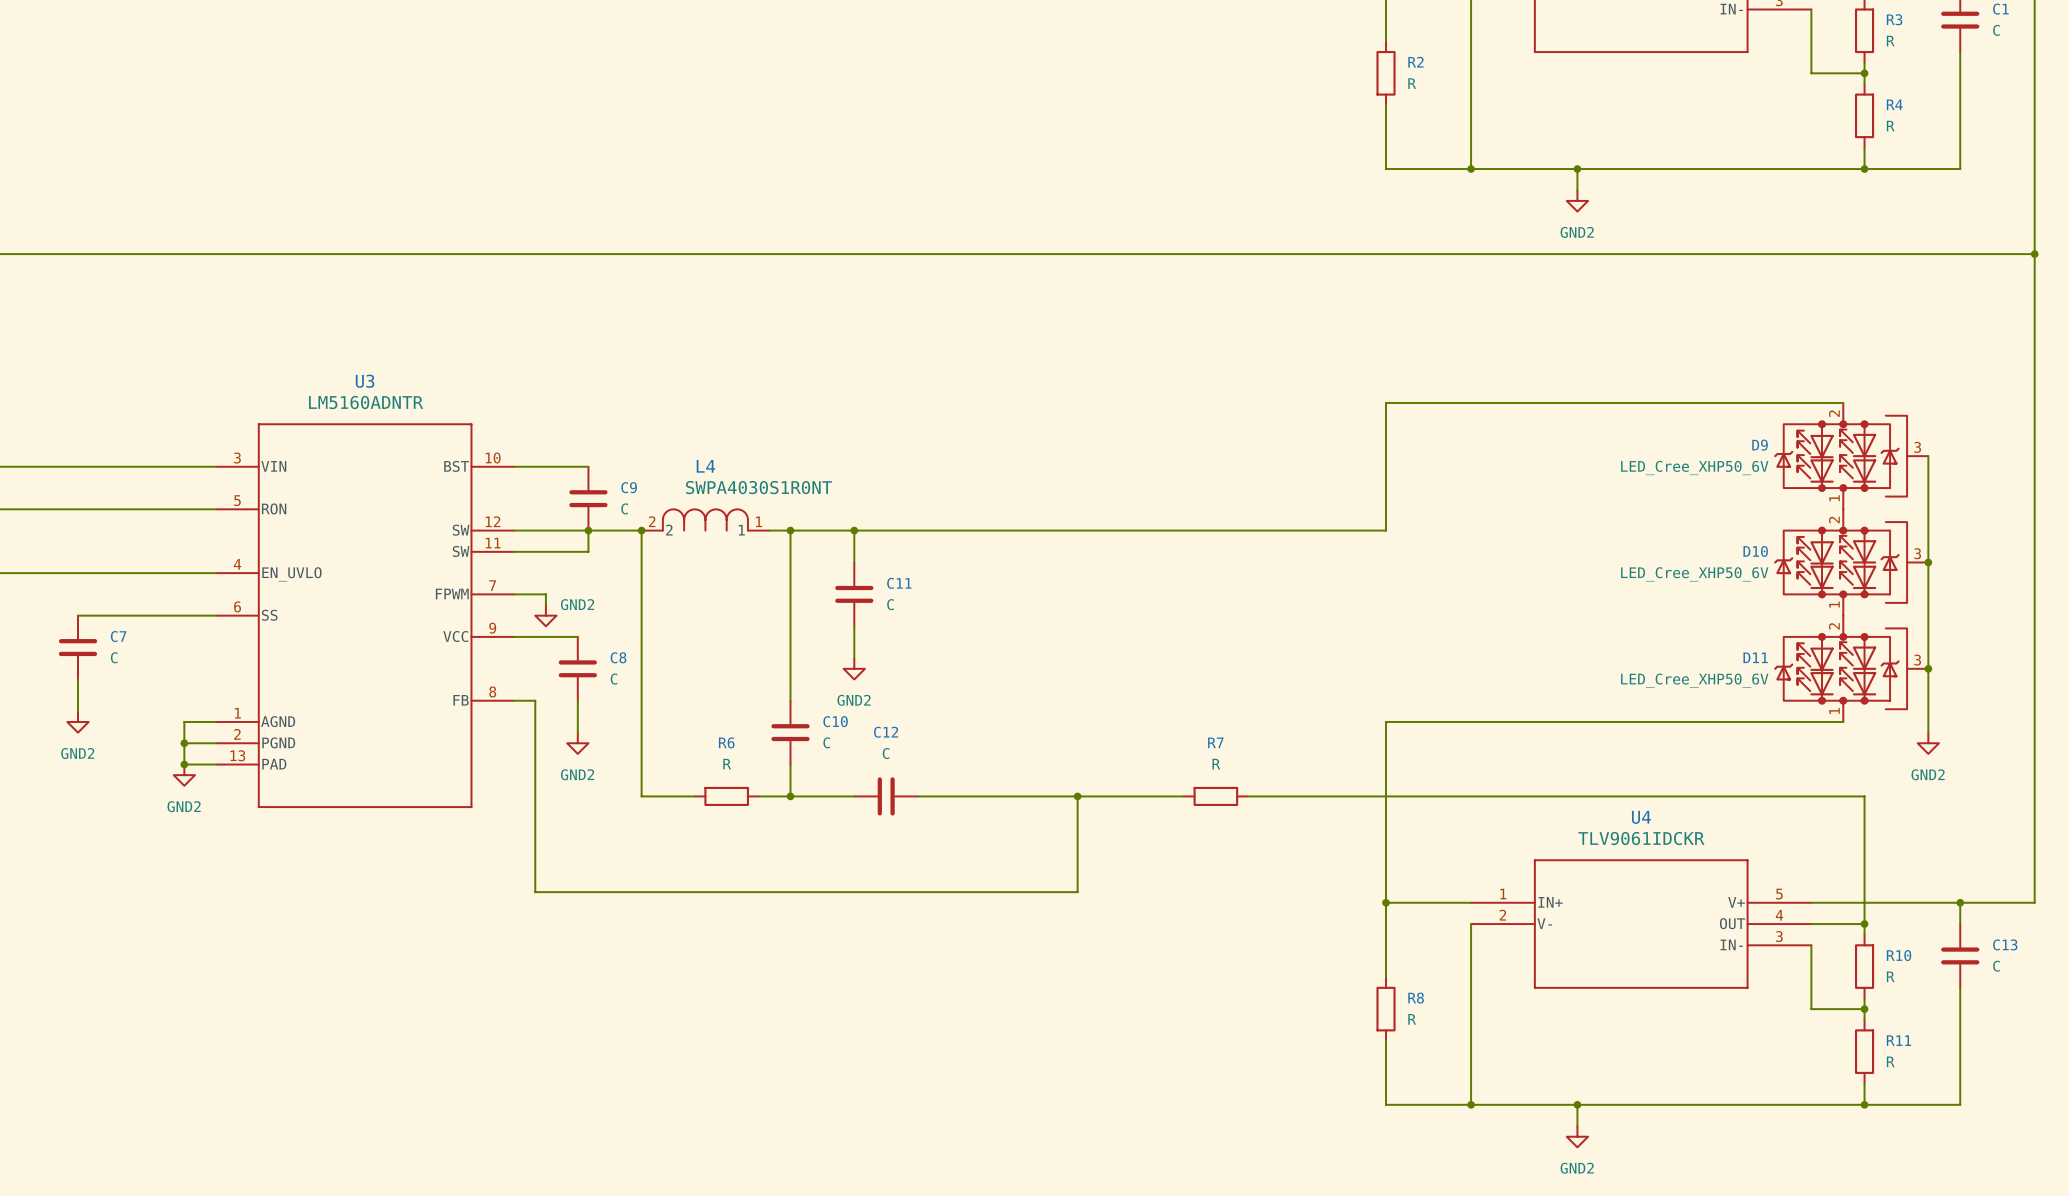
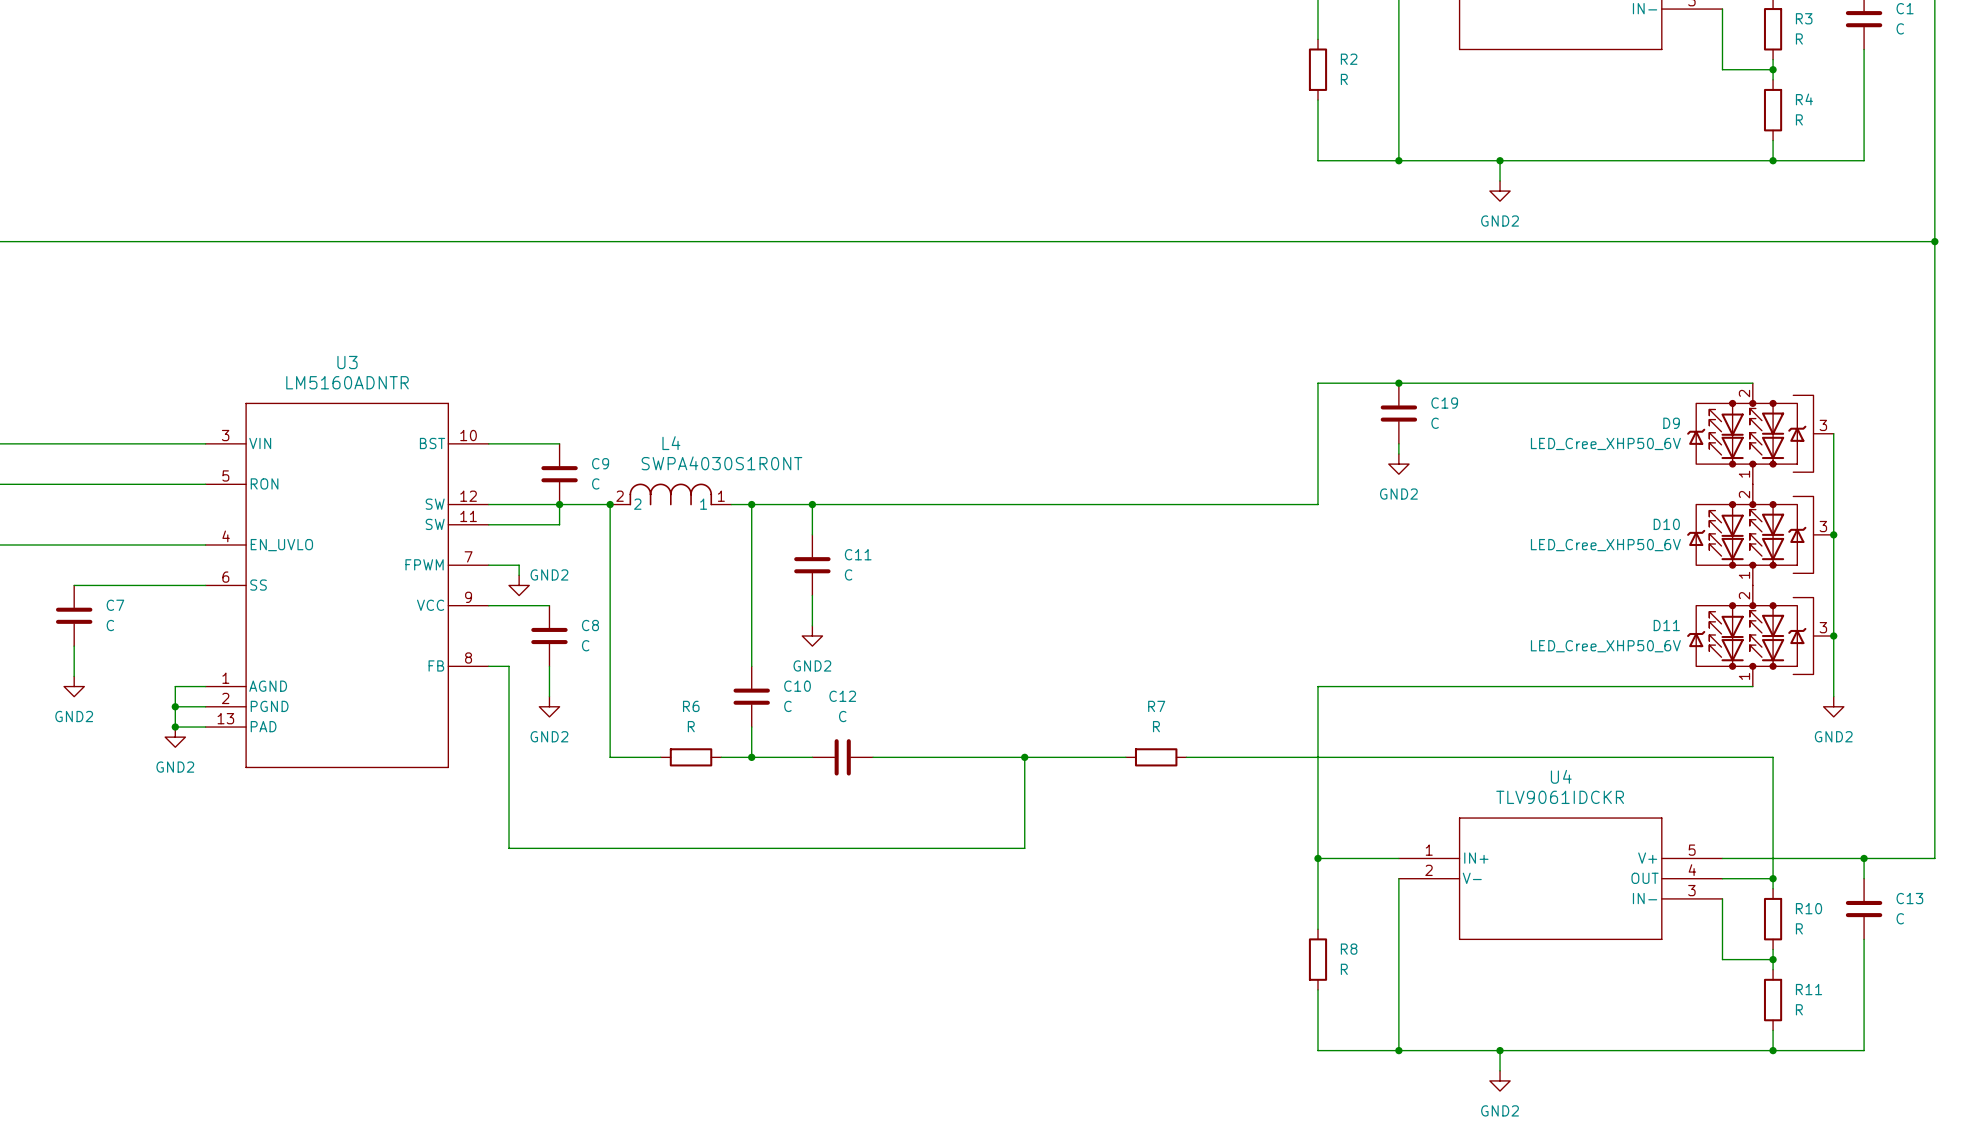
junction: none -> (1398, 383)
C19: none -> C (1398, 413)
wire: none -> (1398, 443) (1398, 453)
power symbol: none -> GND2 (1398, 464)

